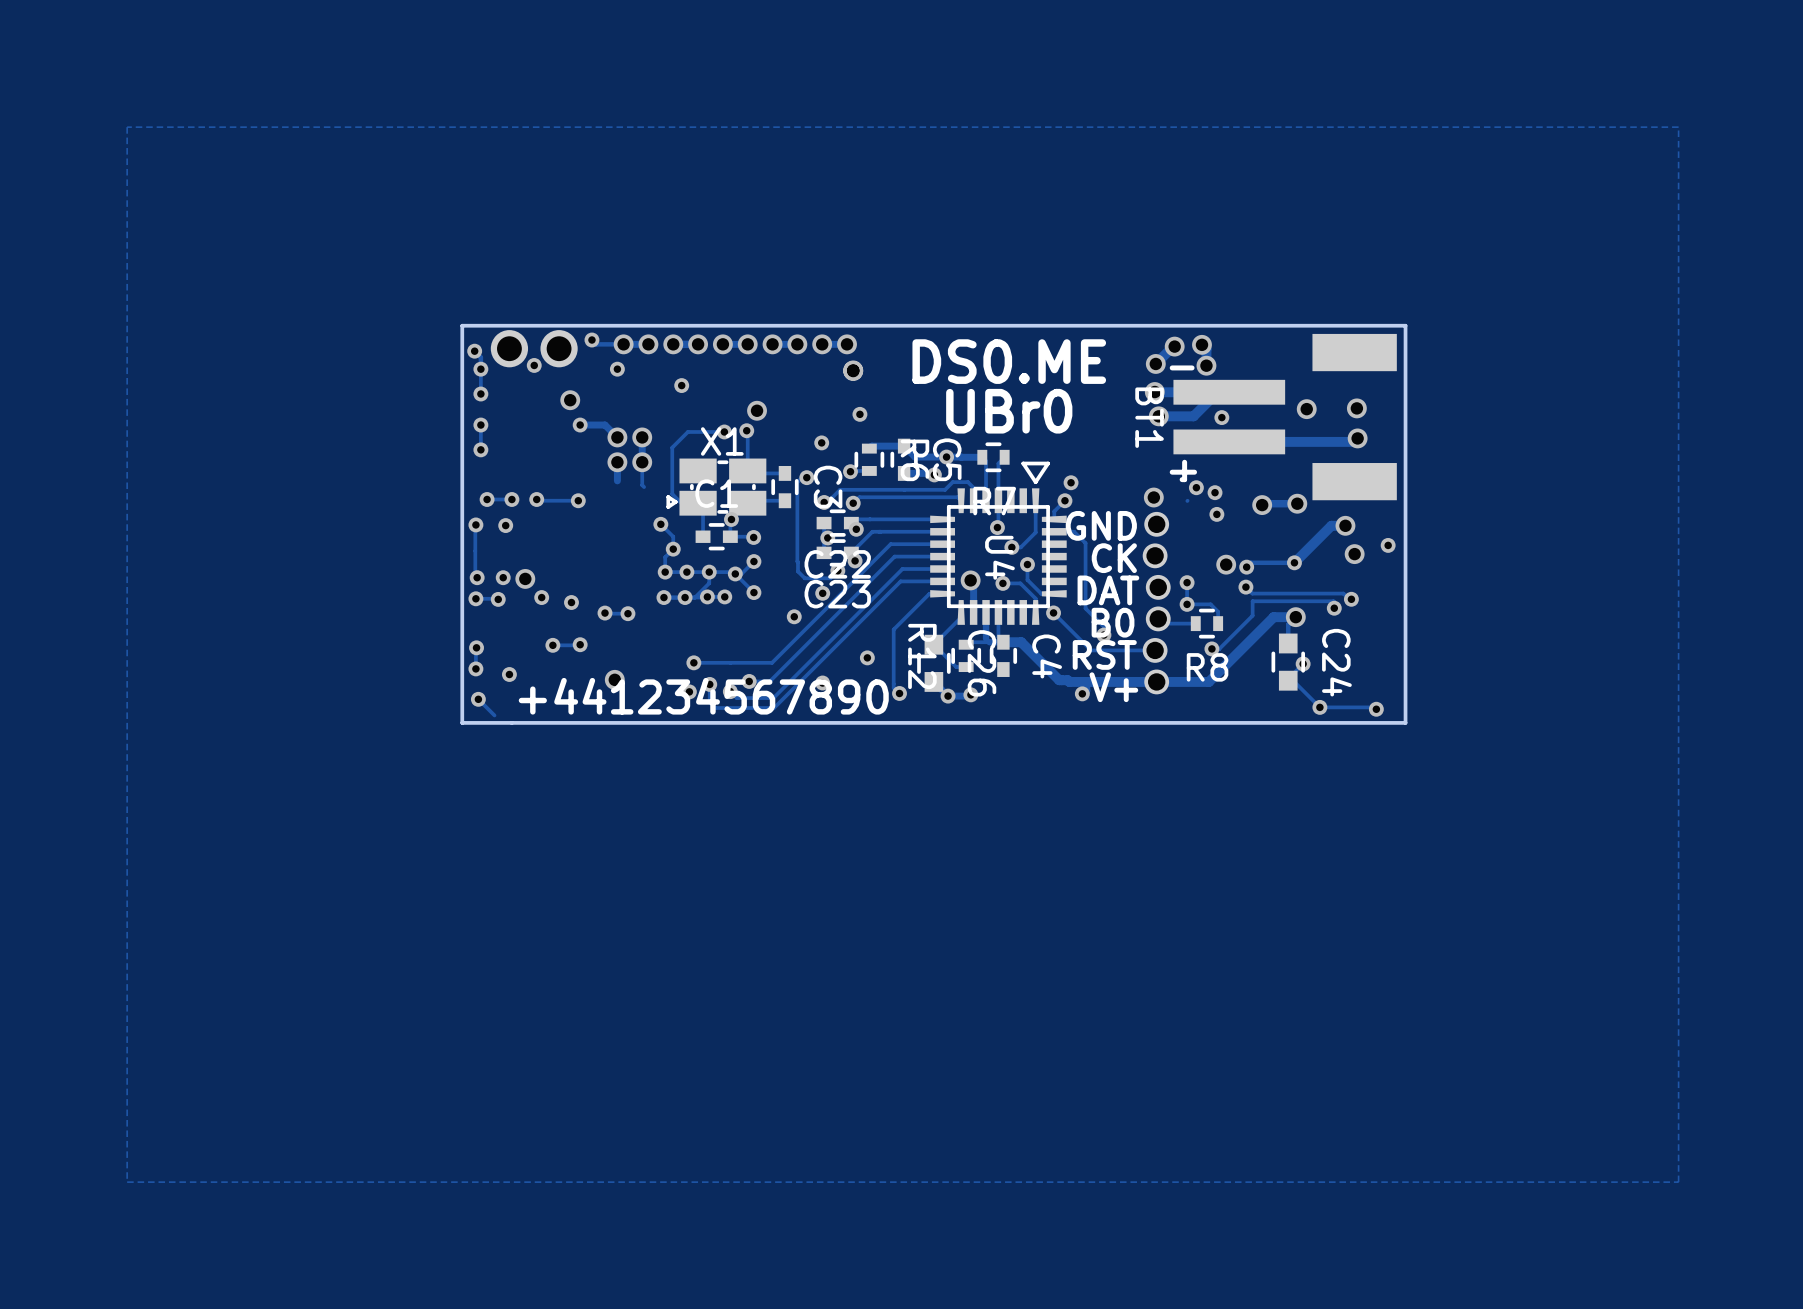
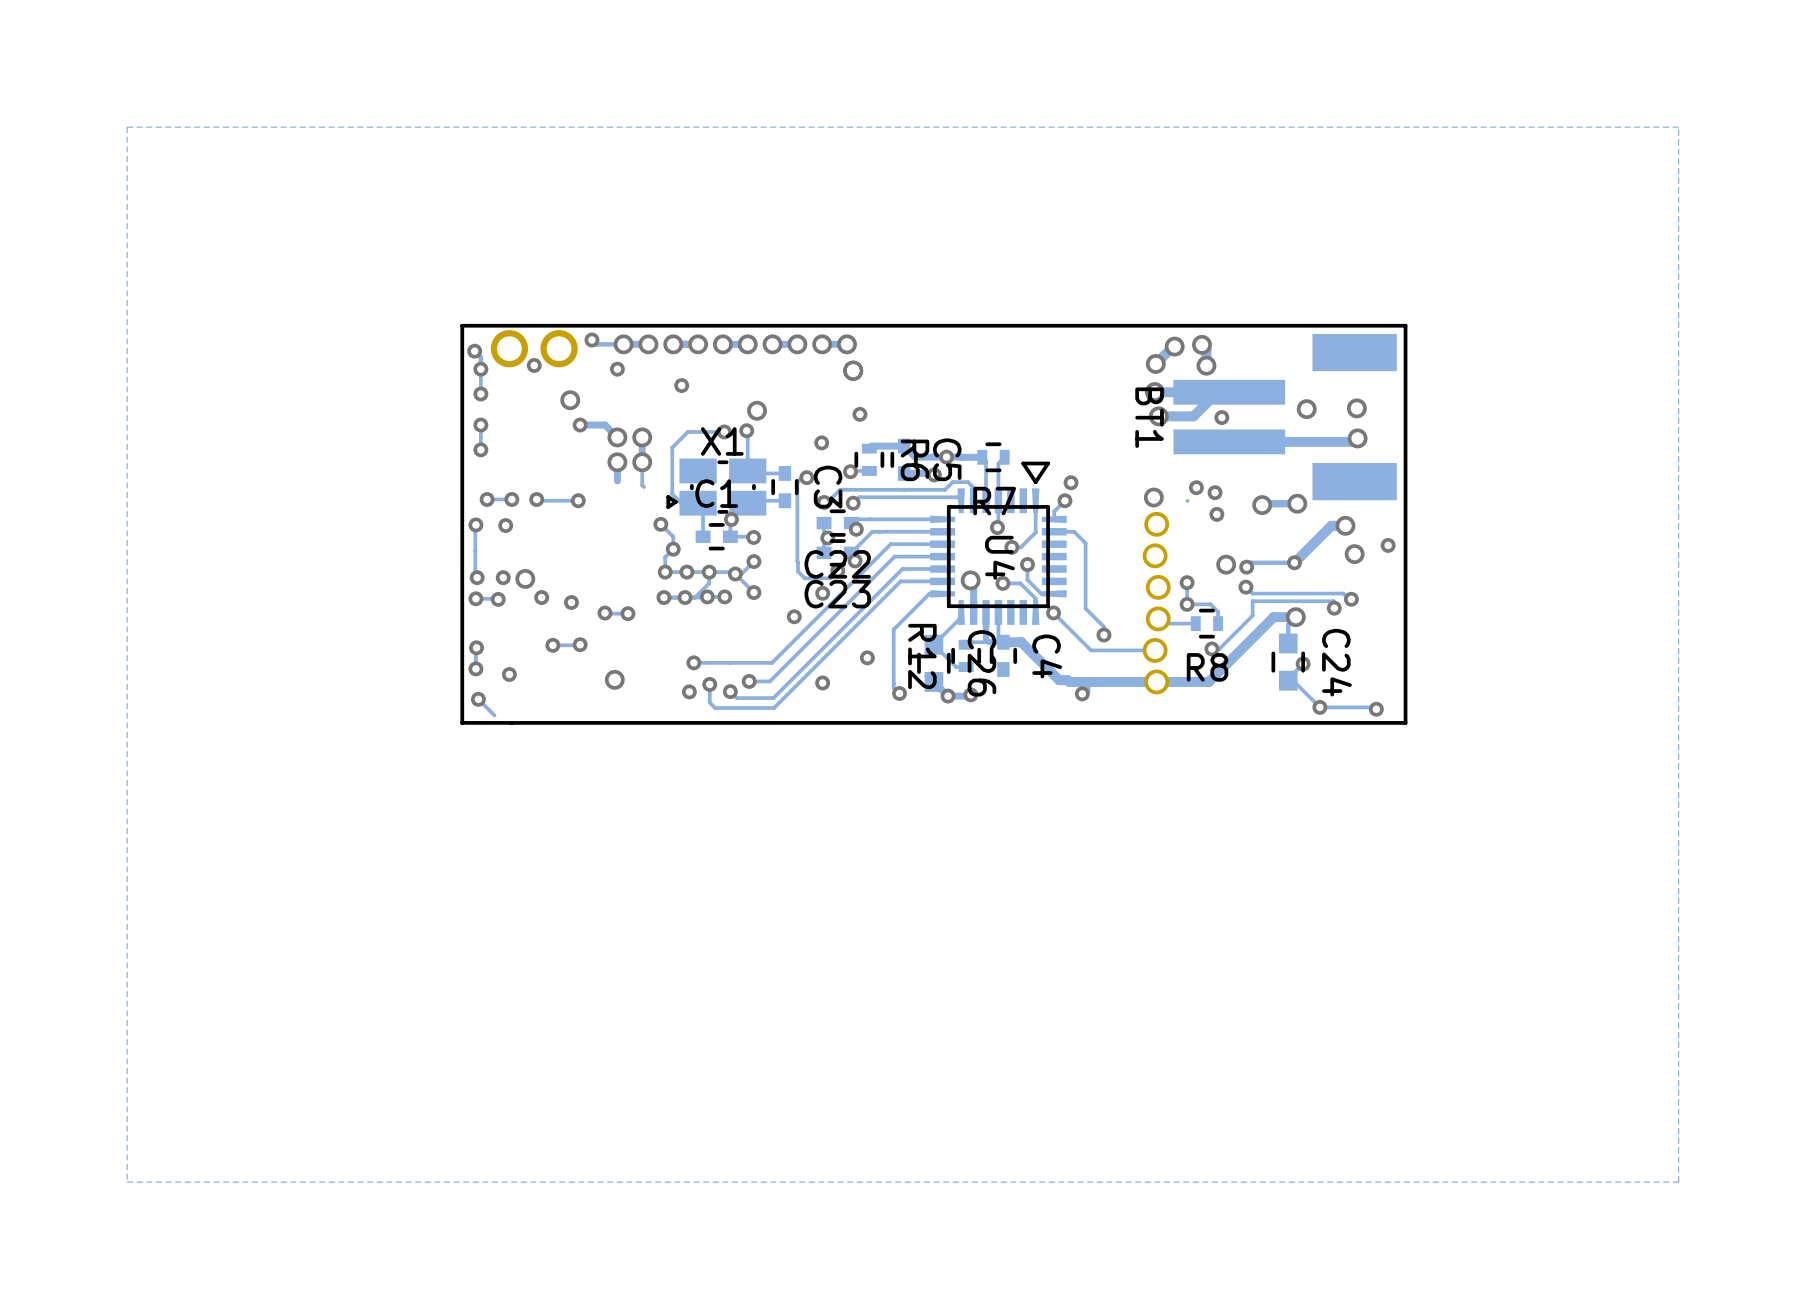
text: DS0.ME (1009, 361) -> none
line: (1192, 367) (1172, 367) -> none
text: UBr0 (1009, 411) -> none
line: (1184, 462) (1184, 479) (1182, 479) -> none
line: (1194, 472) (1172, 472) -> none
text: GND (1101, 525) -> none
text: CK (1114, 558) -> none
text: DAT (1108, 590) -> none
text: B0 (1113, 622) -> none
text: RST (1104, 654) -> none
text: V+ (1113, 687) -> none
text: +441234567890 (703, 696) -> none

